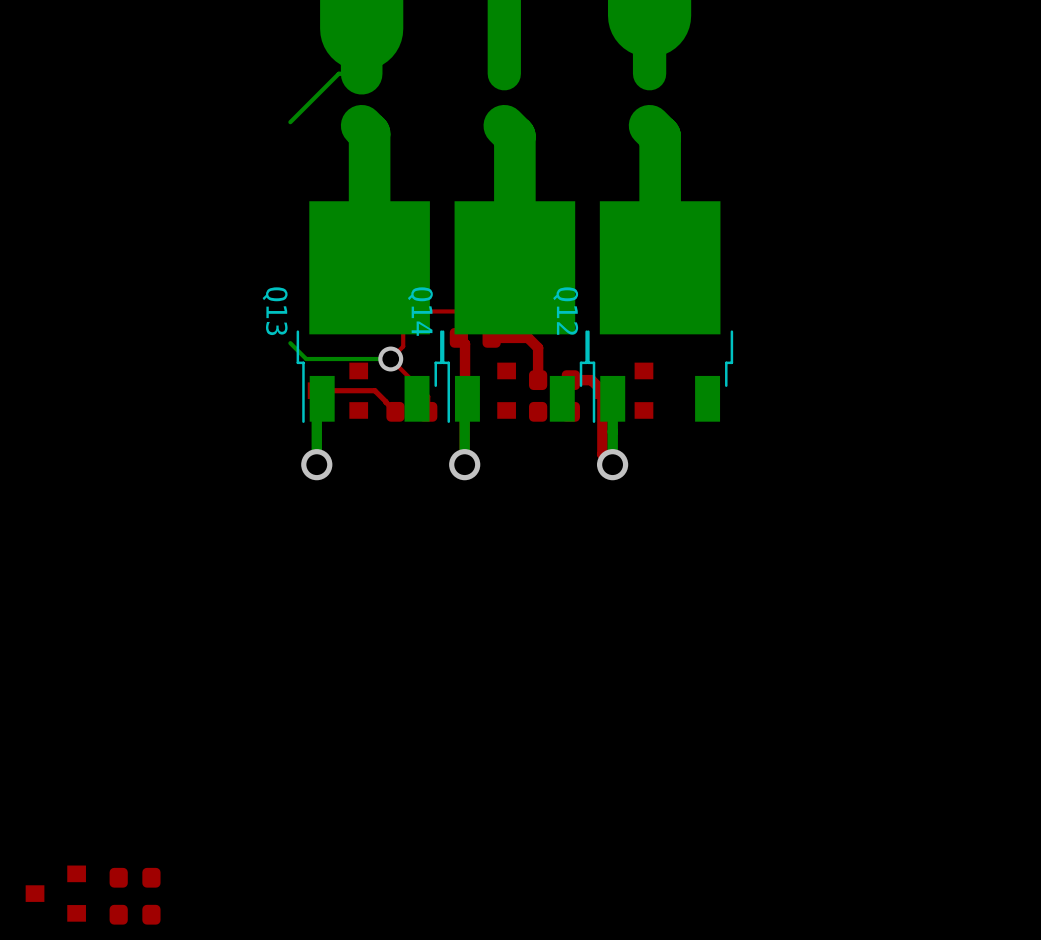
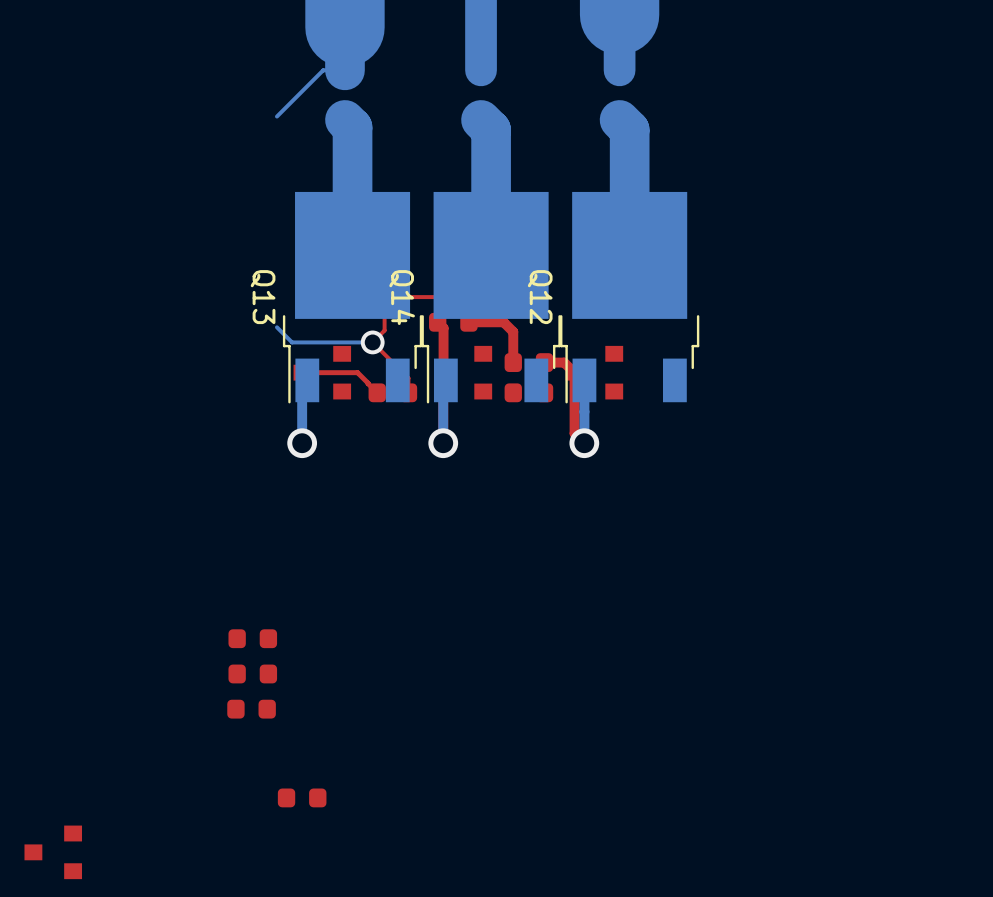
part: none -> (252, 638)
part: none -> (252, 673)
part: none -> (251, 709)
part: none -> (302, 797)
part: (135, 877) -> none
part: (135, 914) -> none

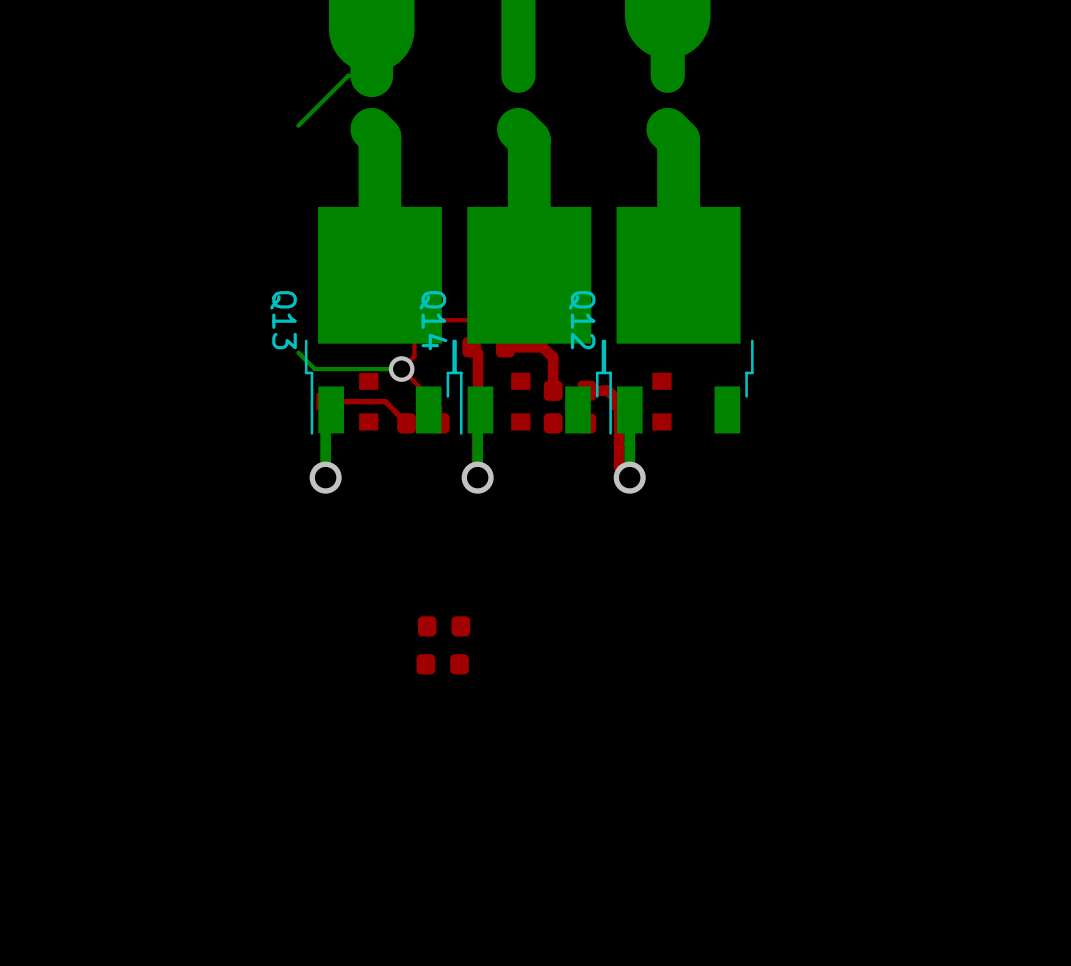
part: none -> (444, 626)
part: none -> (442, 664)
part: (252, 638) -> none
part: (252, 673) -> none
part: (251, 709) -> none
part: (302, 797) -> none
part: (53, 852) -> none

